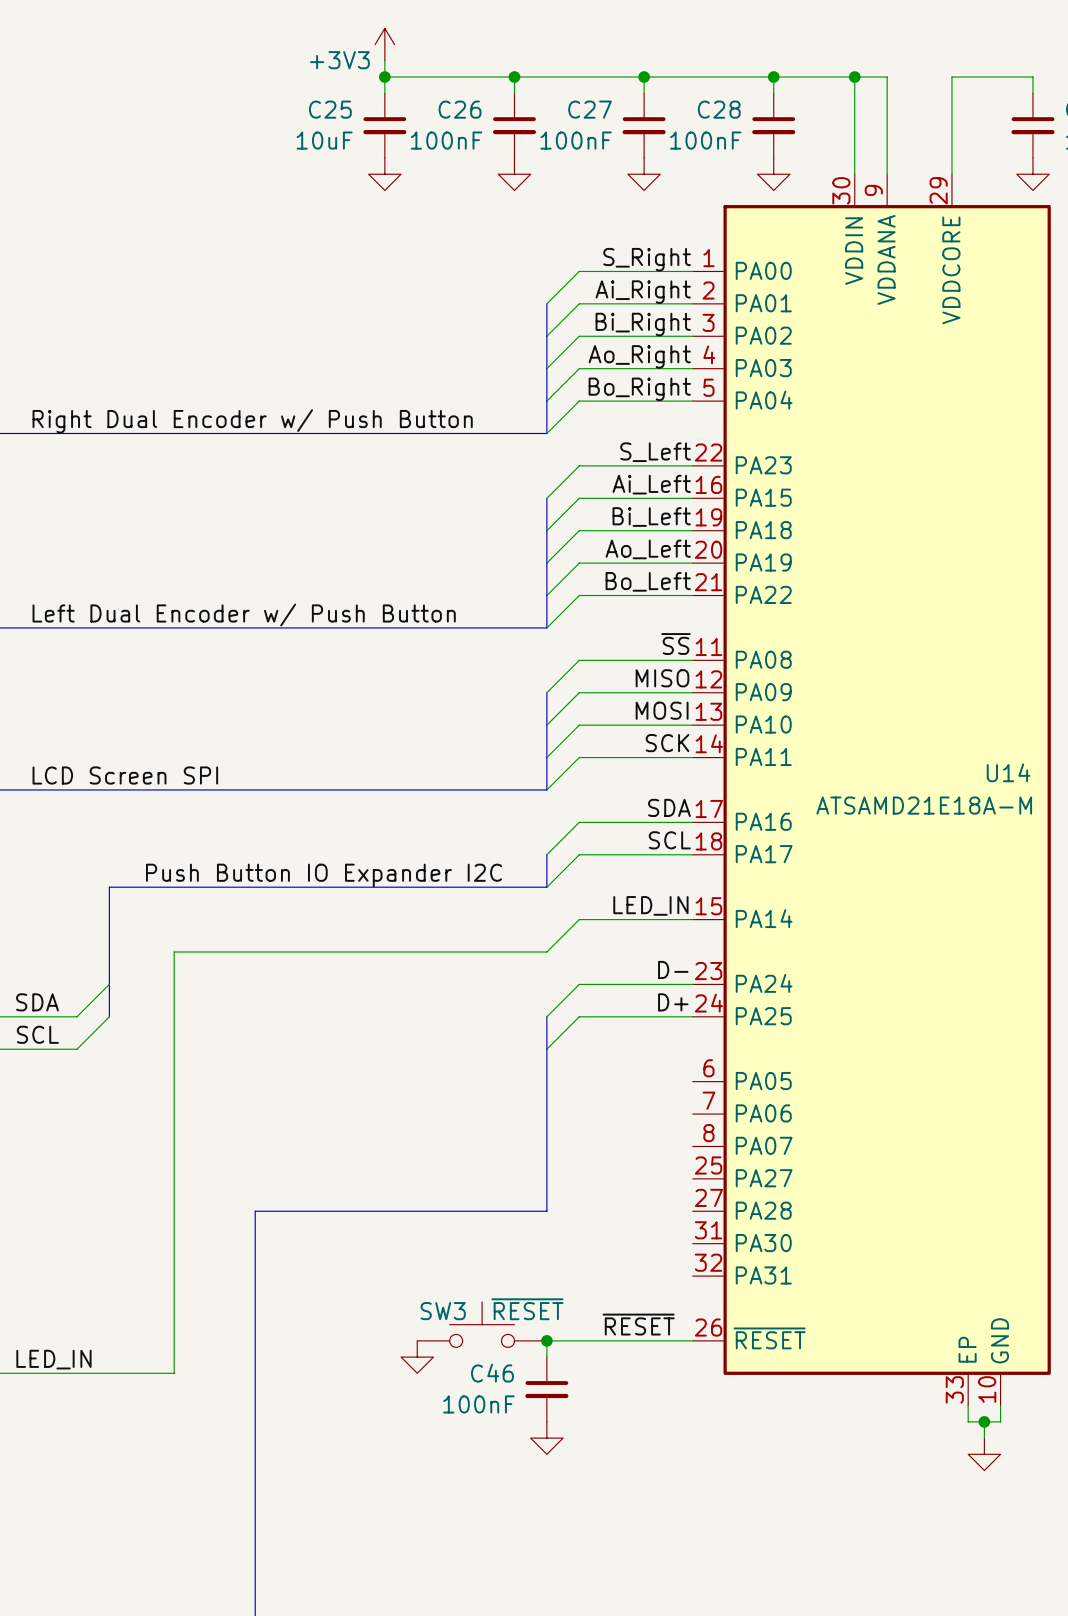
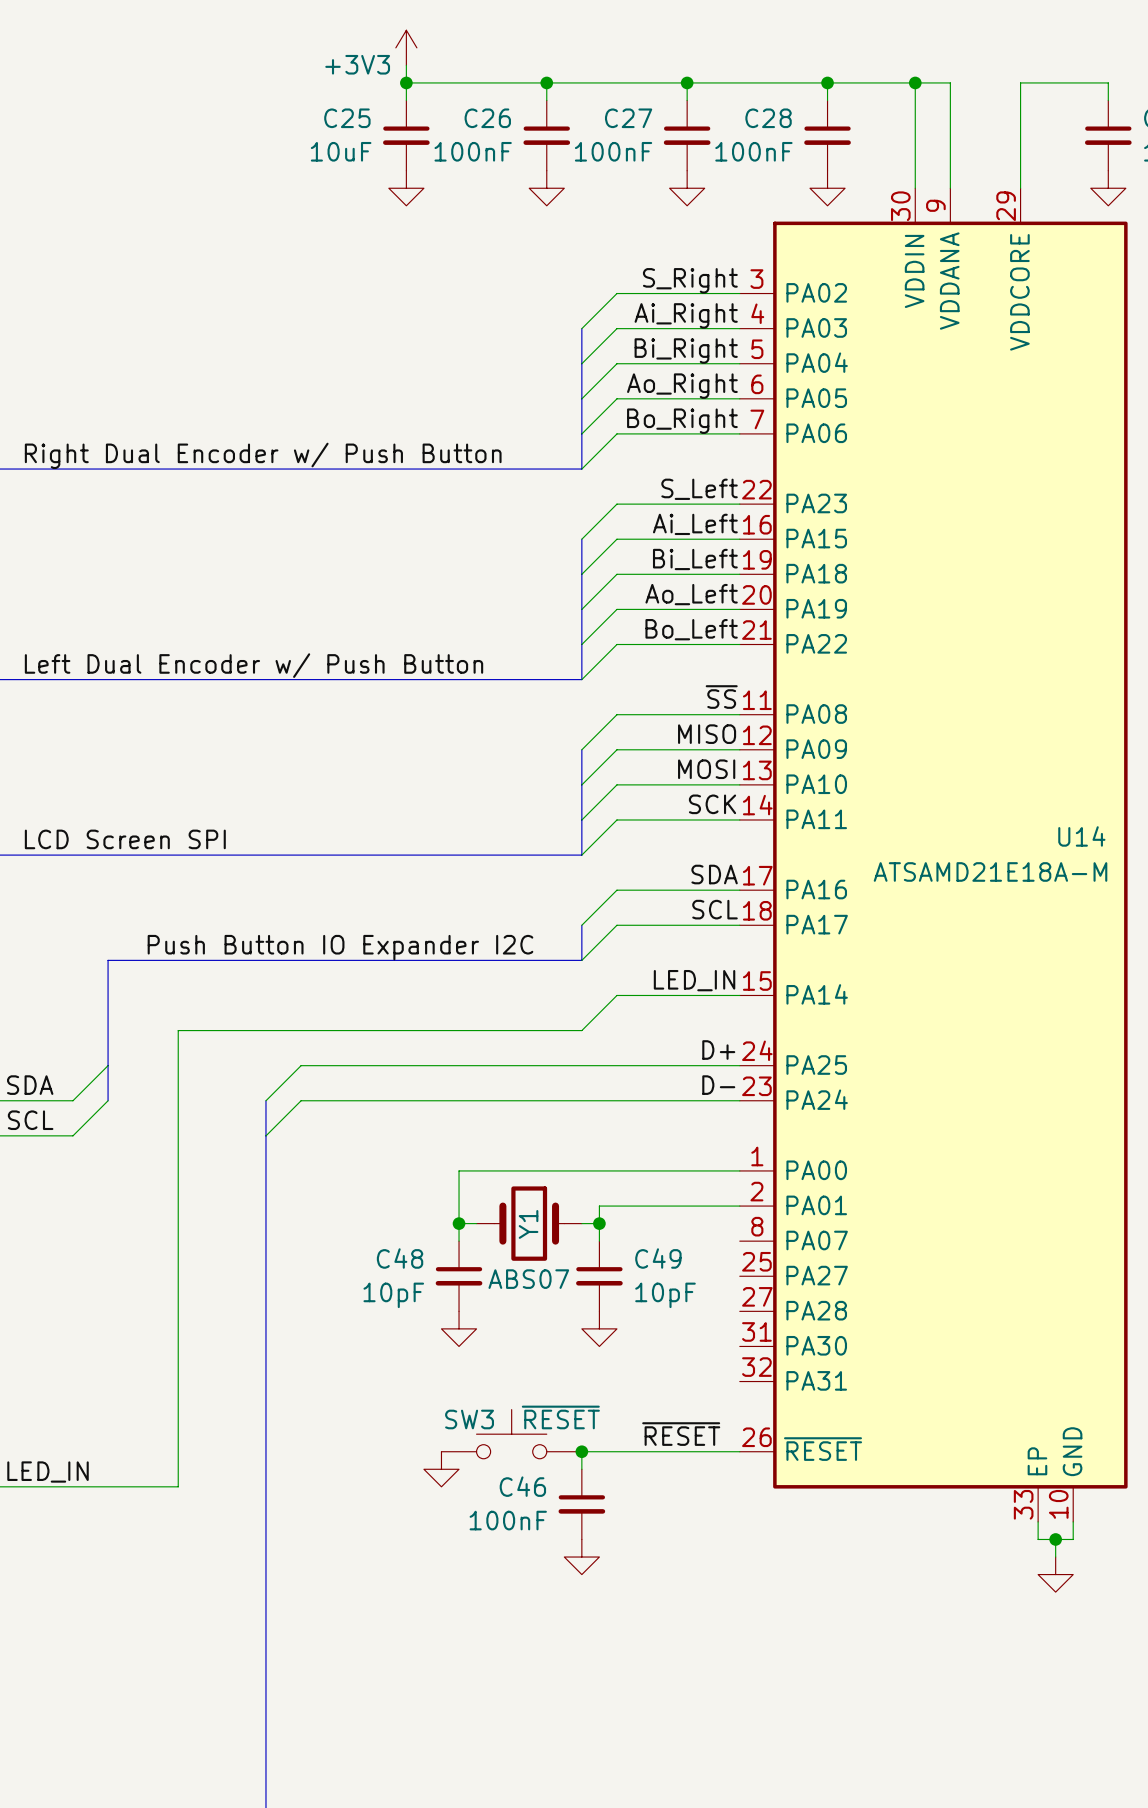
U14 symbol: [692, 174, 1051, 1406] -> [739, 188, 1128, 1522]
label: D- (673, 969) -> D+ (718, 1050)
wire: (579, 984) (546, 1016) -> (616, 1065) (301, 1065) (265, 1100)
label: D+ (673, 1002) -> D- (718, 1085)
bus: (546, 1016) (546, 1211) (255, 1211) -> (265, 1100) (265, 1311)
wire: (579, 1016) (546, 1049) -> (616, 1100) (301, 1100) (265, 1135)
wire: none -> (739, 1170) (459, 1170) (459, 1241)
wire: none -> (739, 1206) (599, 1206) (599, 1241)
wire: none -> (459, 1223) (476, 1223)
junction: none -> (459, 1223)
Y1: none -> ABS07 (529, 1223)
wire: none -> (581, 1223) (599, 1223)
junction: none -> (599, 1223)
C48: none -> 10pF (459, 1276)
C49: none -> 10pF (599, 1276)
power symbol: none -> (459, 1328)
power symbol: none -> (599, 1328)

